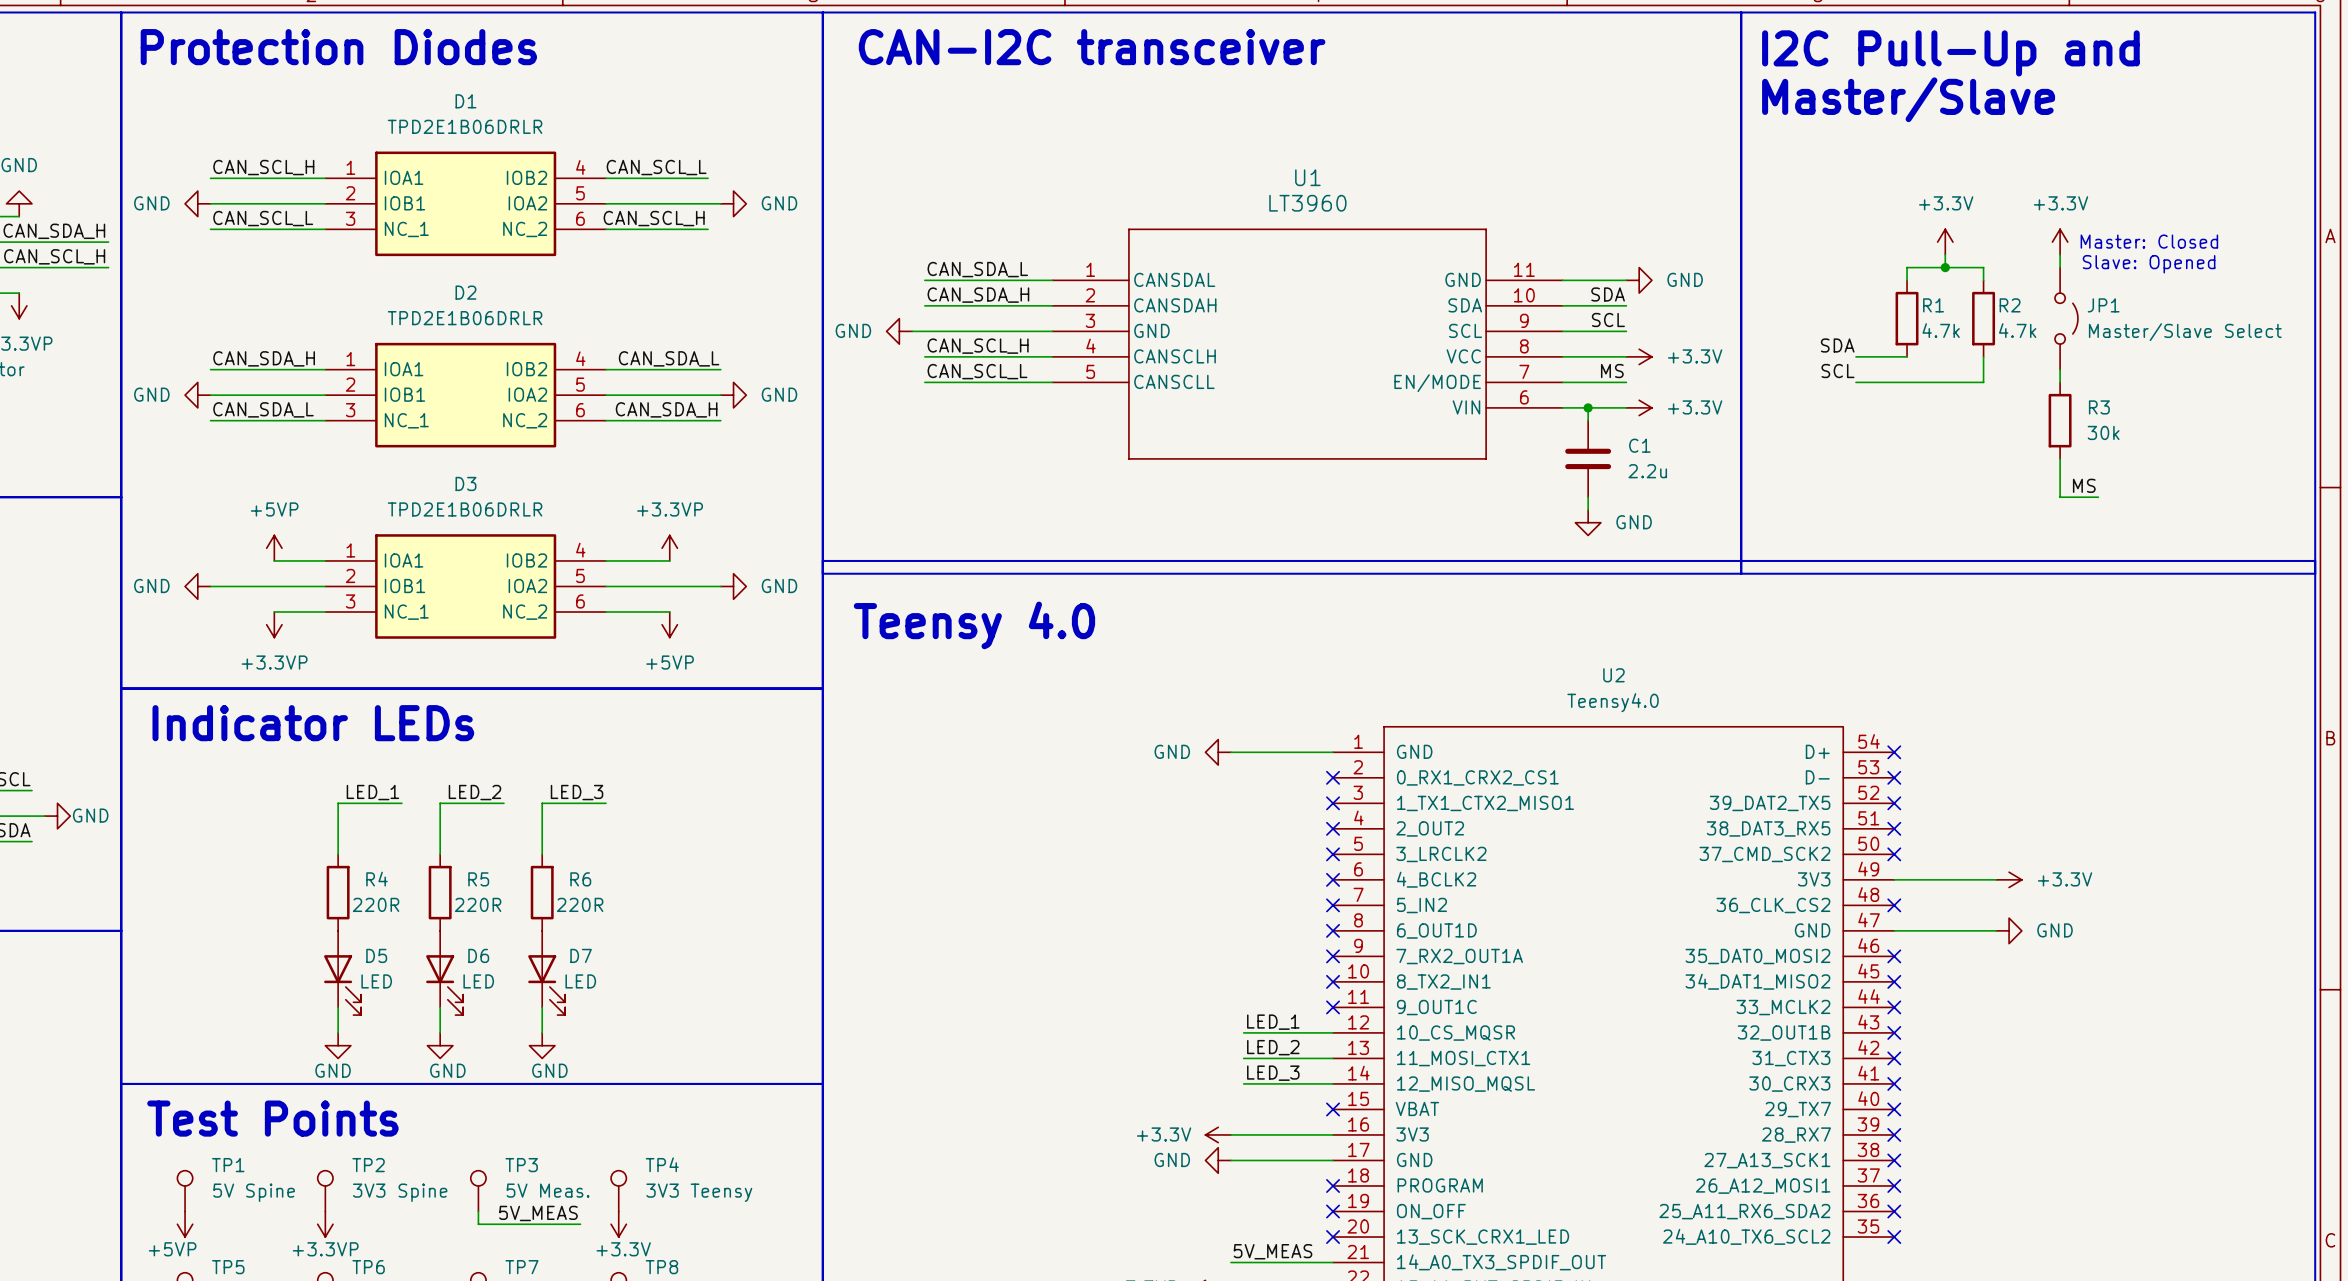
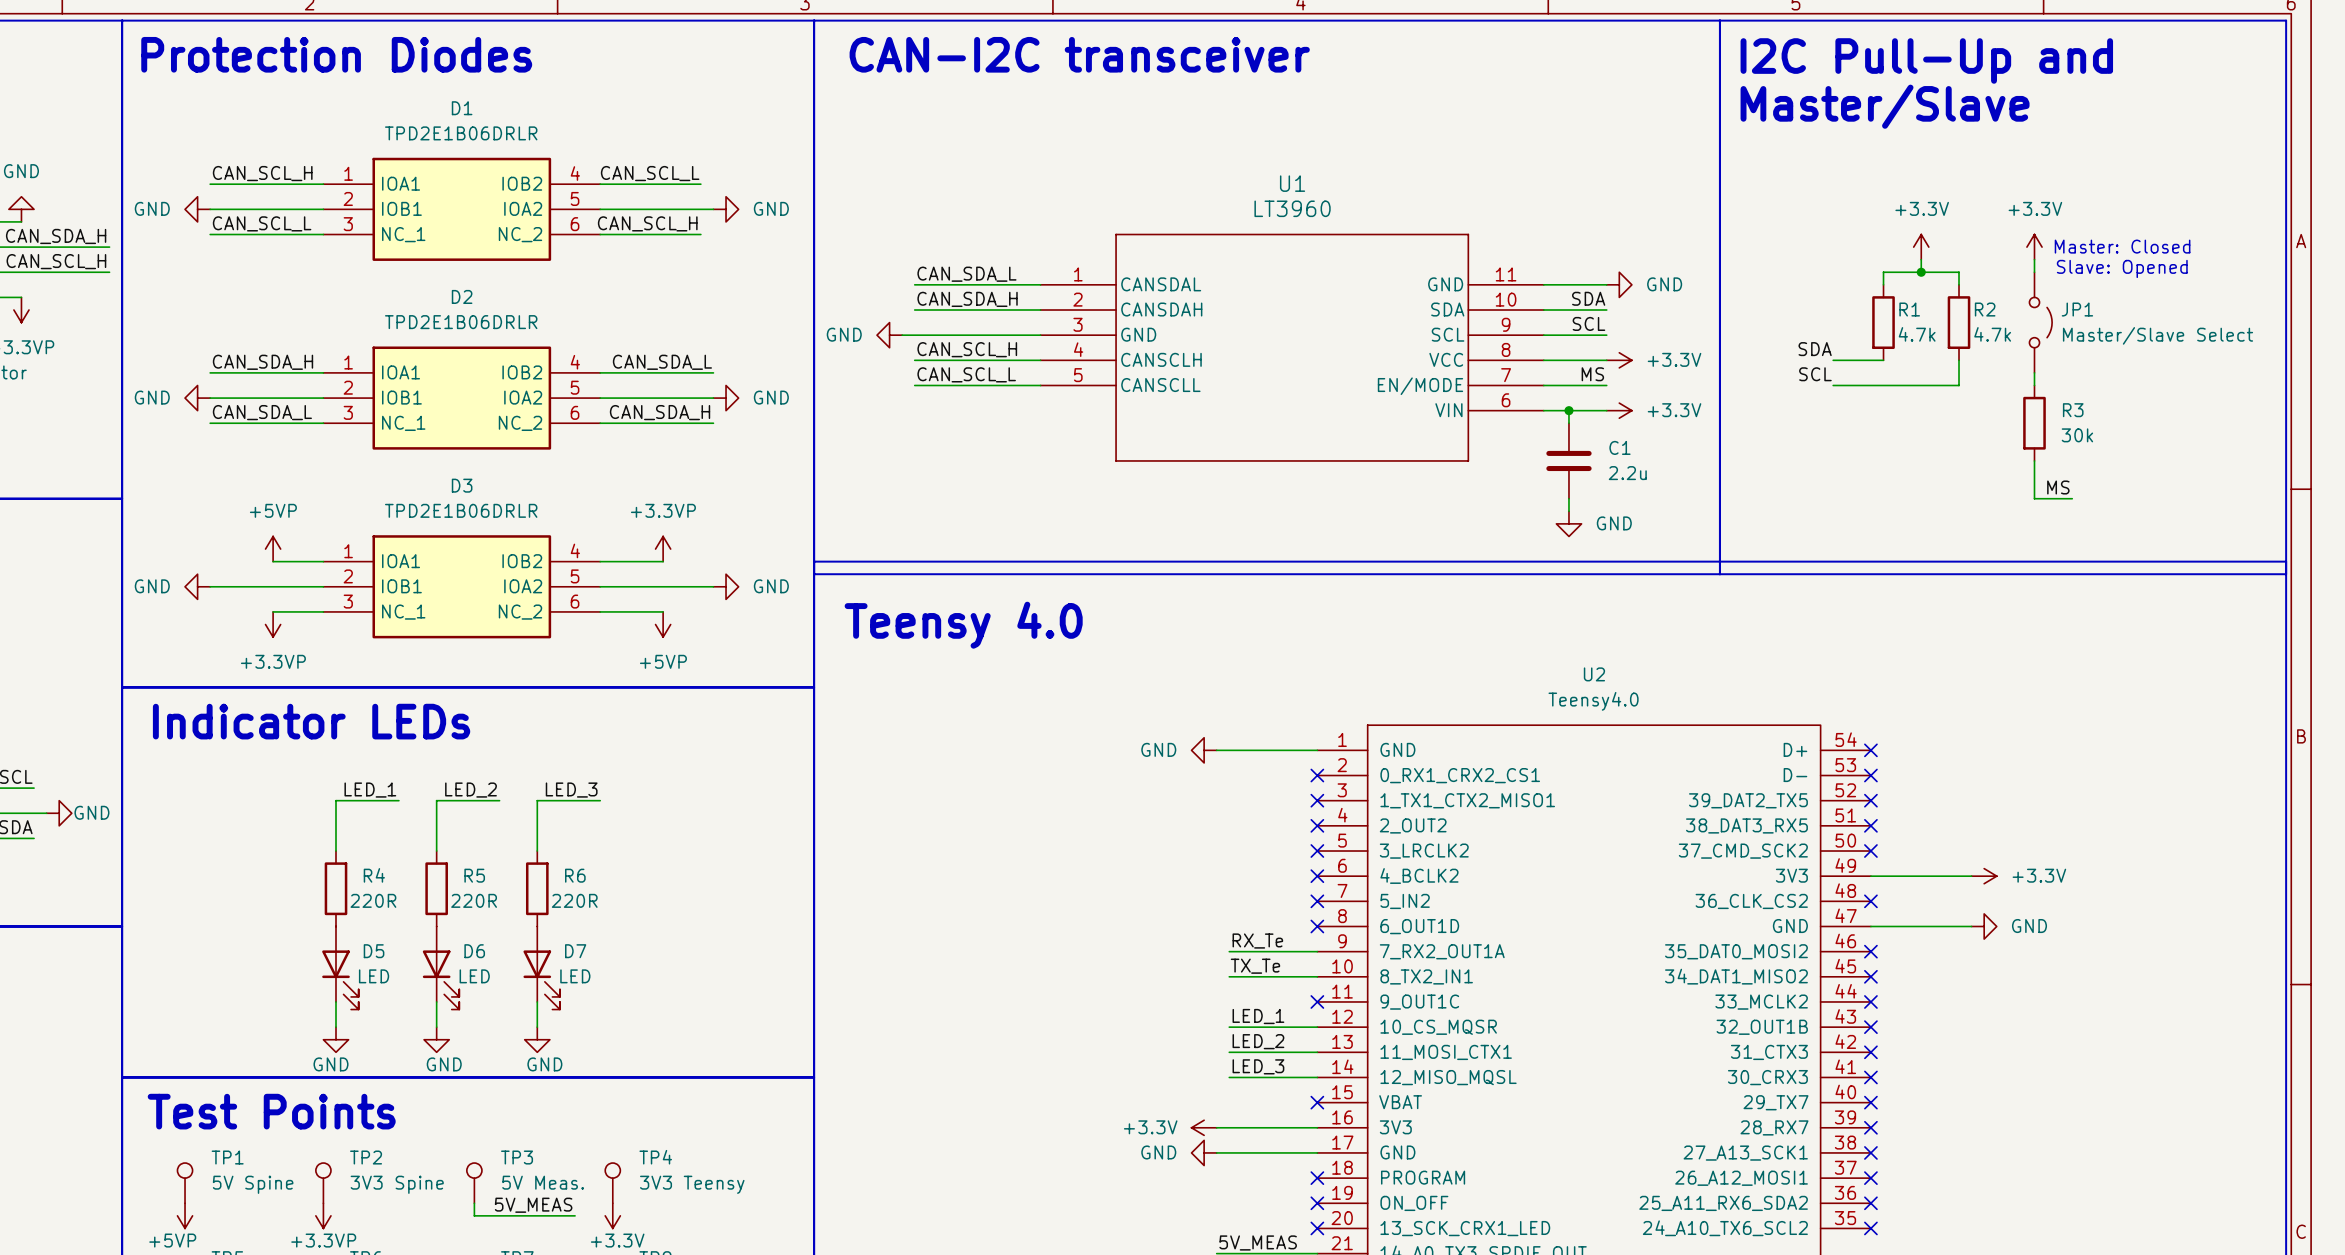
label: none -> RX_Te (1257, 941)
wire: none -> (1229, 951) (1317, 951)
no-connect mark: (1333, 956) -> none
label: none -> TX_Te (1255, 966)
wire: none -> (1229, 976) (1317, 976)
no-connect mark: (1333, 981) -> none

